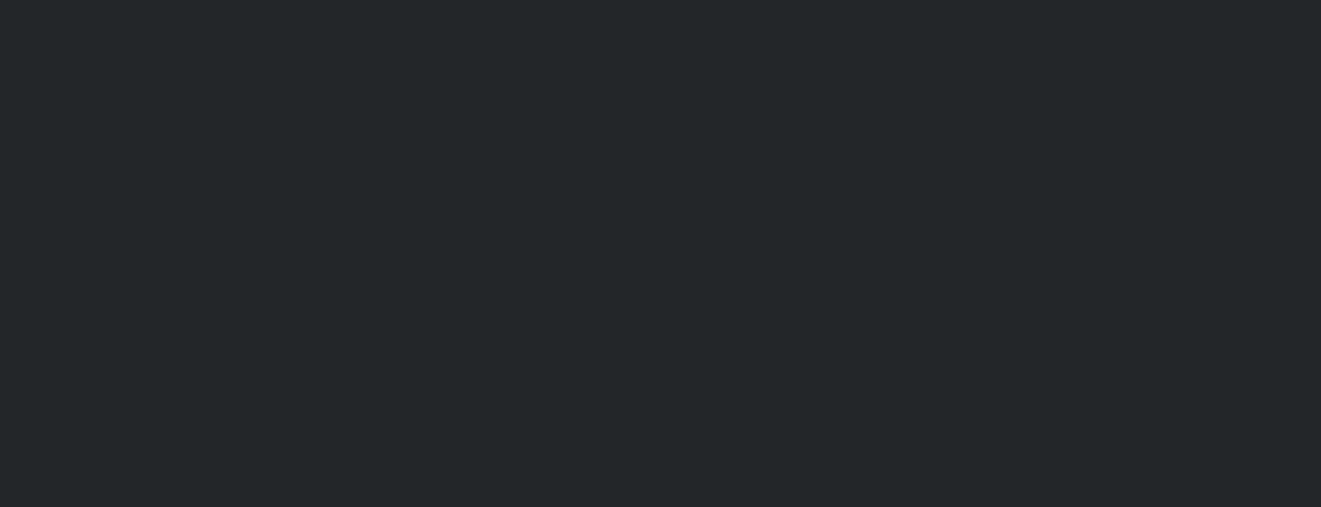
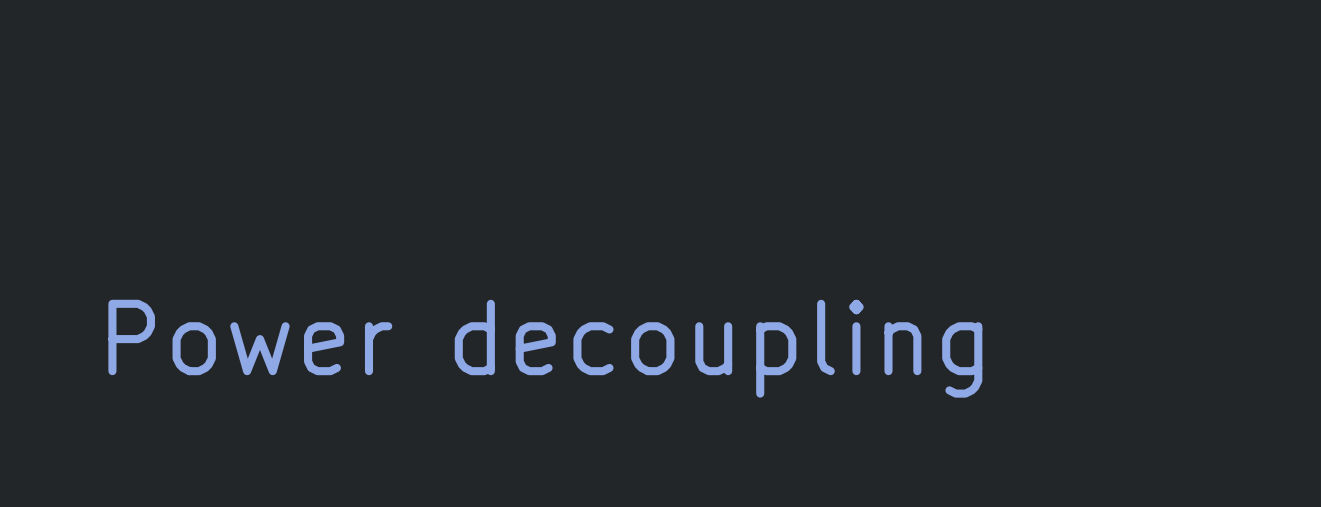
text: none -> Power decoupling (545, 348)

